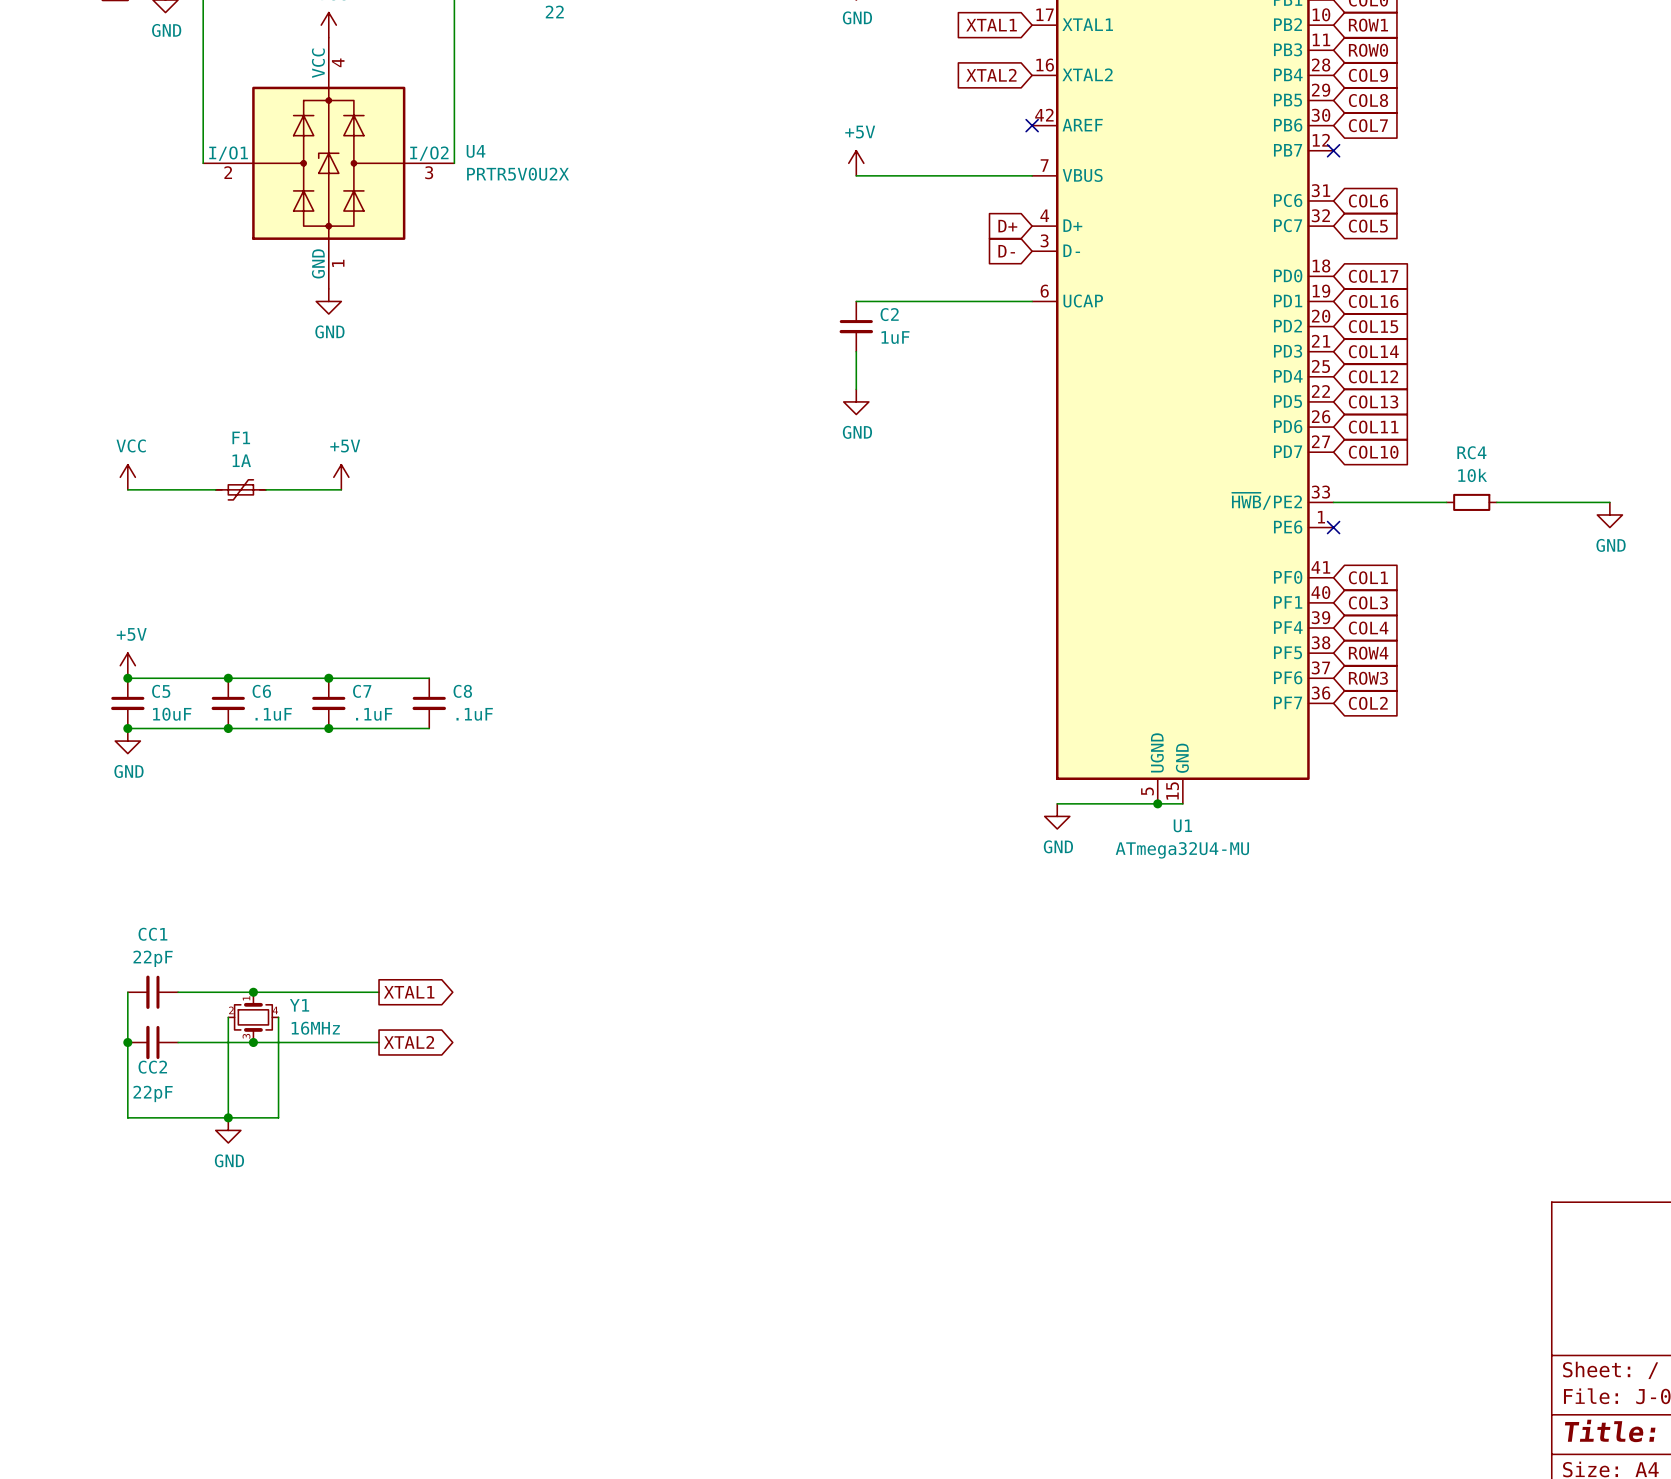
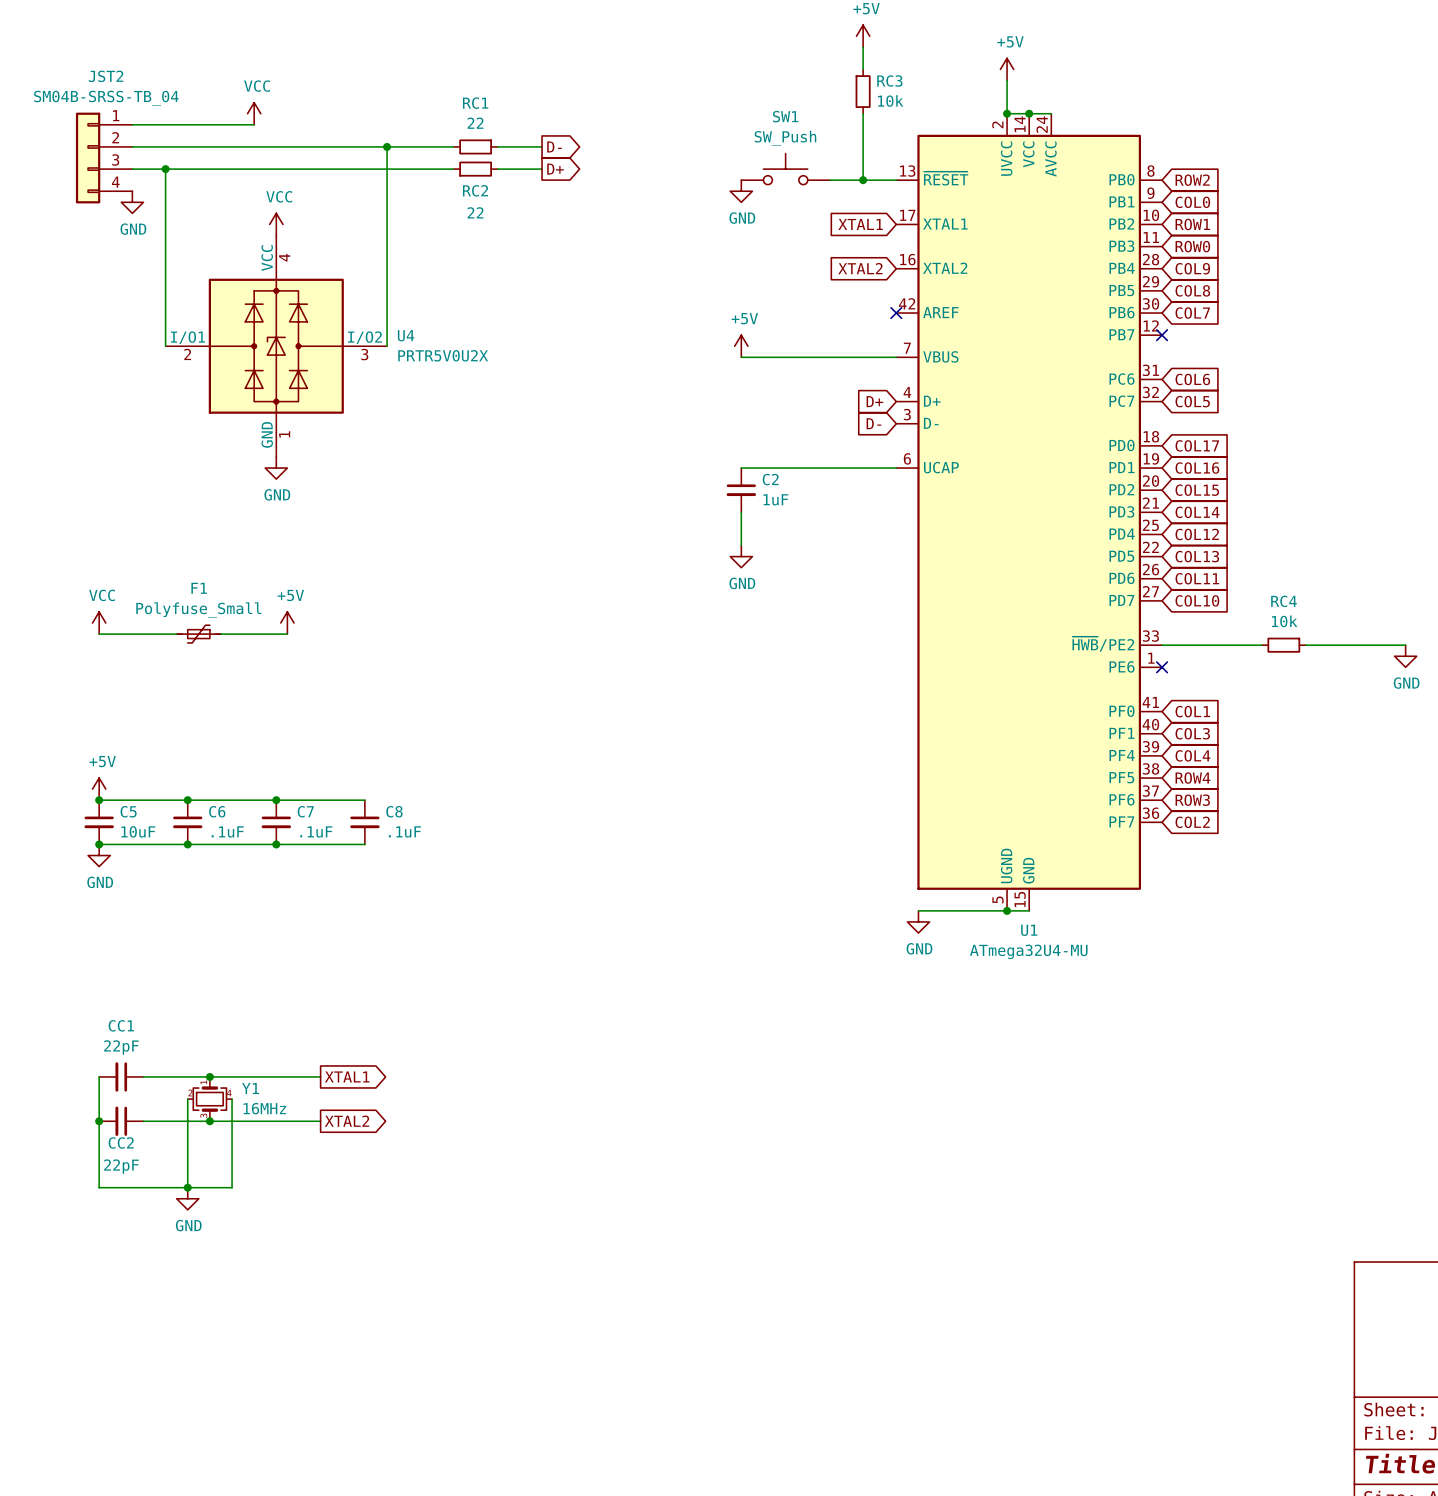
F1 value: 1A (241, 460) -> Polyfuse_Small (198, 609)

